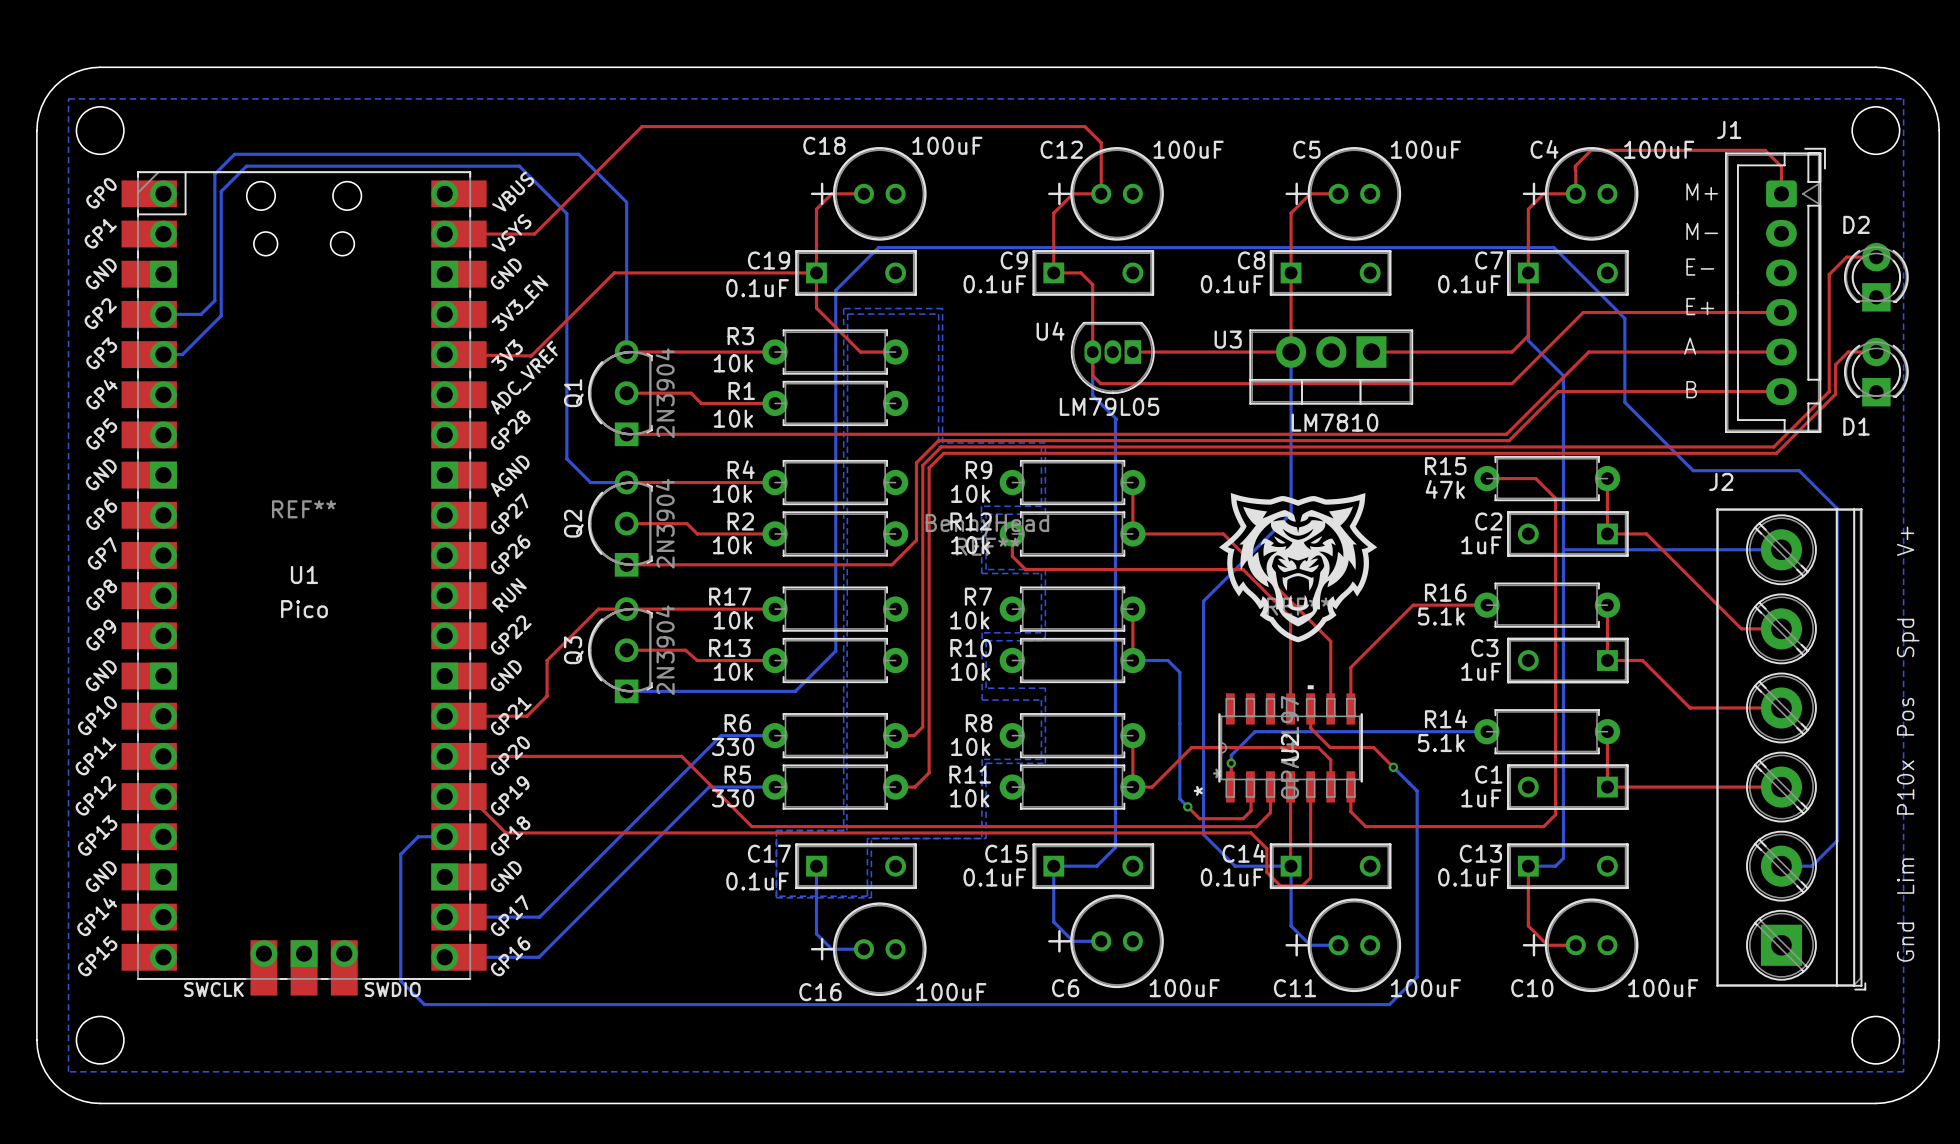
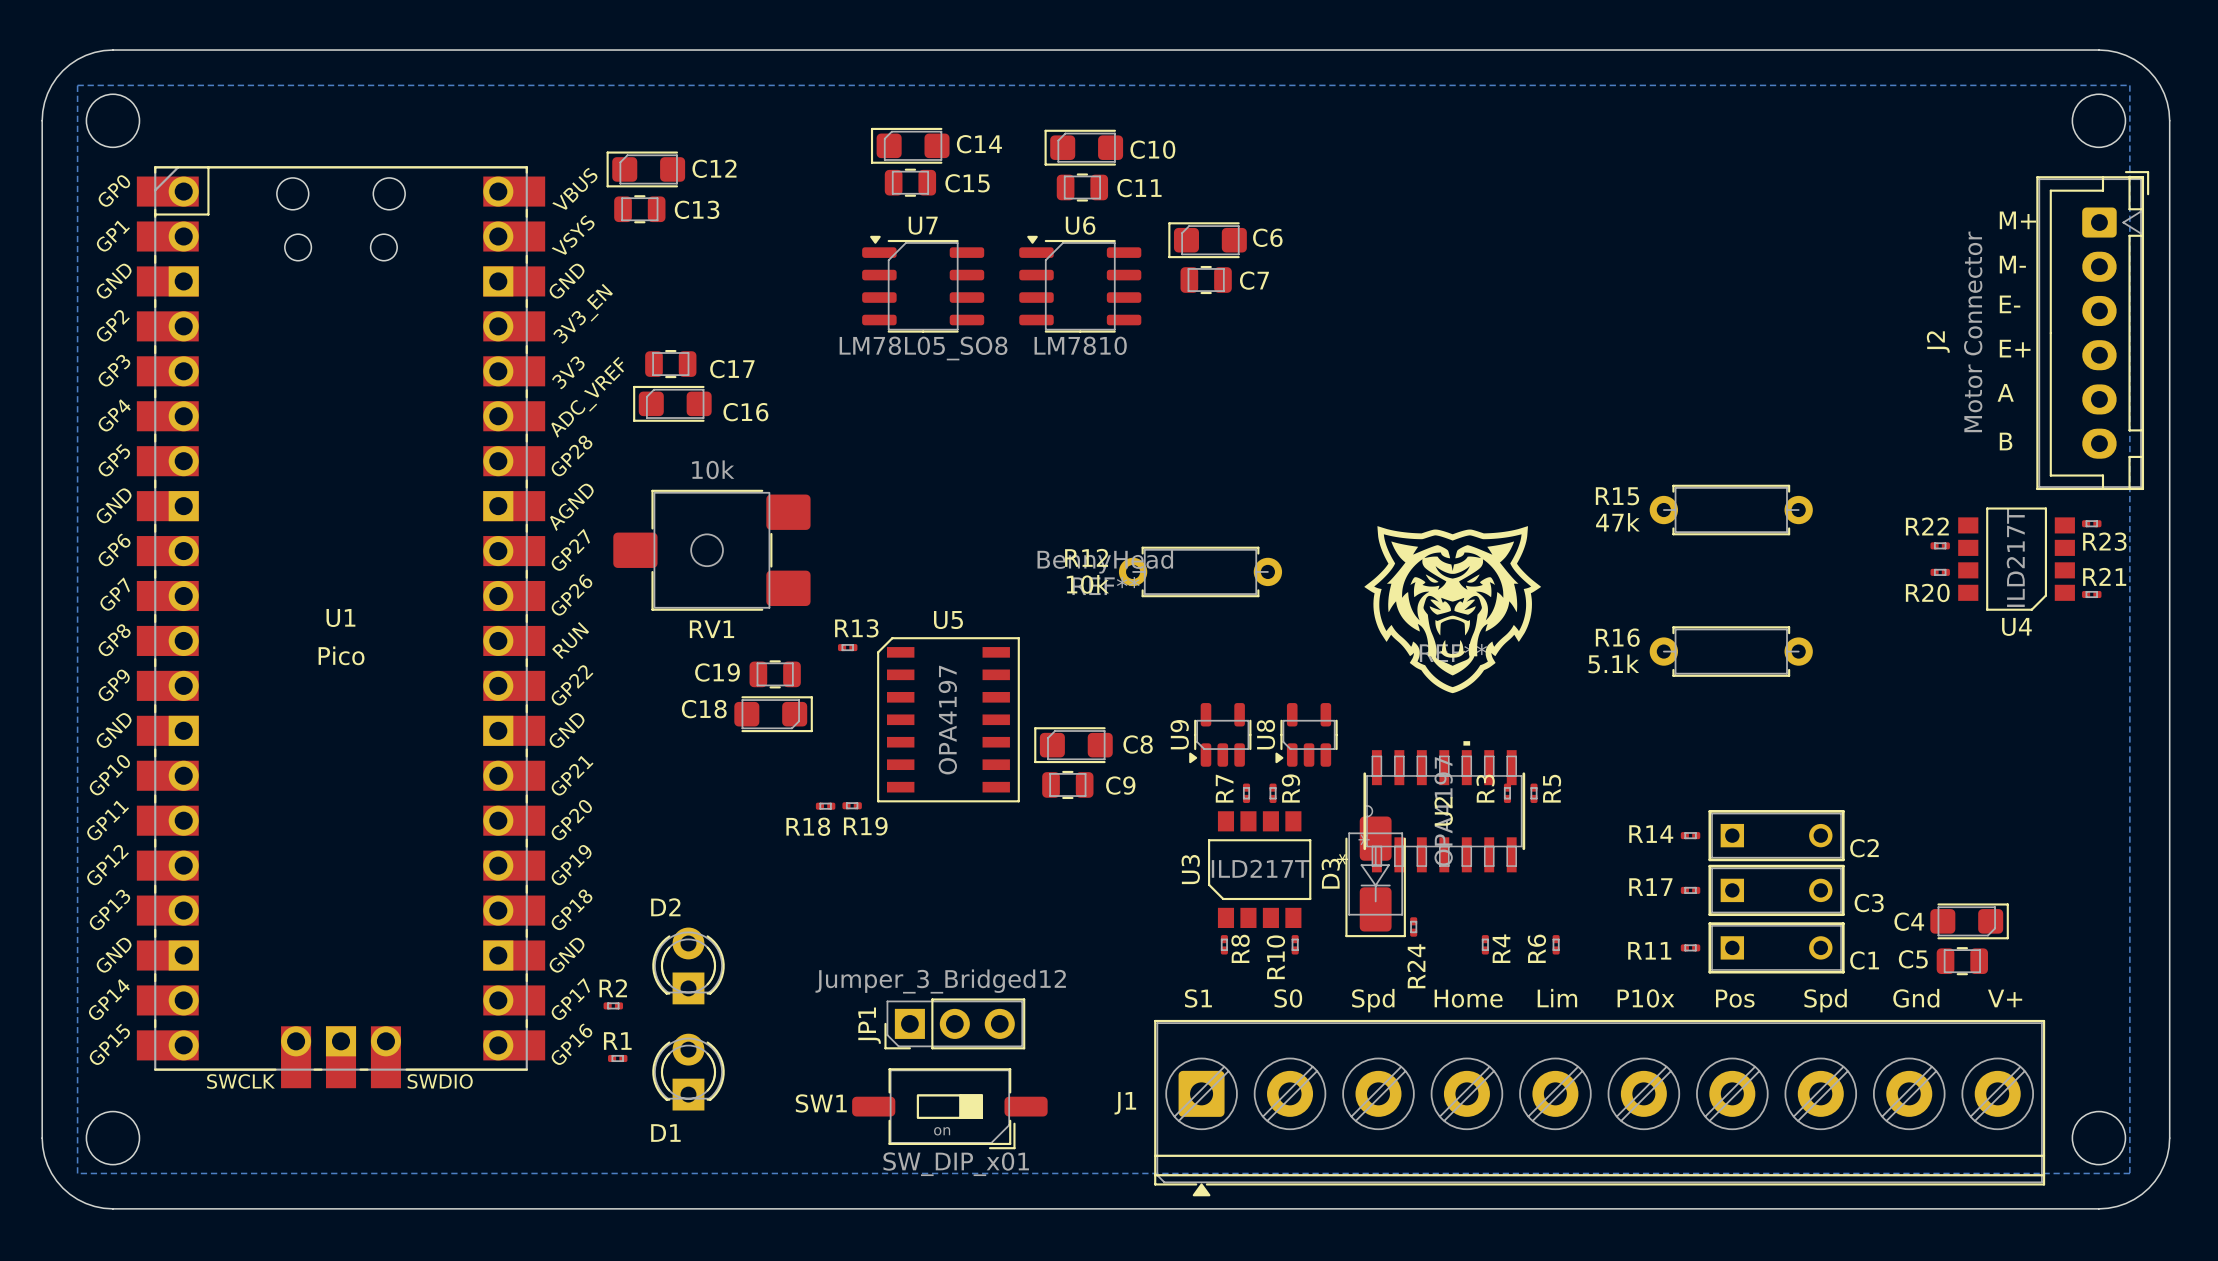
J1 name position: J1 (1729, 129) -> J1 (1125, 1103)
C18 name position: C18 (824, 145) -> C18 (704, 709)
C18 value: 100uF (947, 145) -> none
C18 footprint: [810, 147, 927, 241] -> [734, 696, 813, 733]
C12 footprint: [1048, 147, 1164, 241] -> [606, 151, 686, 188]
C5 footprint: [1285, 147, 1402, 241] -> [1936, 947, 1988, 976]
C4 footprint: [1522, 147, 1639, 241] -> [1930, 903, 2009, 940]
J1 footprint: [1724, 147, 1826, 434] -> [1154, 1019, 2046, 1197]
C12 name position: C12 (1061, 149) -> C12 (714, 168)
C12 value: 100uF (1188, 149) -> none
C5 name position: C5 (1306, 149) -> C5 (1913, 959)
C5 value: 100uF (1425, 149) -> none
C4 name position: C4 (1544, 149) -> C4 (1909, 921)
C4 value: 100uF (1659, 149) -> none
text position: M+ (1702, 191) -> M+ (2017, 220)
top track: (863, 193) (831, 193) (816, 209) (816, 308) (860, 352) (895, 352) -> none
top track: (1338, 193) (1310, 193) (1291, 213) (1291, 352) (1132, 352) -> none
top track: (1781, 193) (1781, 166) (1765, 150) (1591, 150) (1575, 166) (1575, 193) (1543, 193) (1528, 209) (1528, 335) (1512, 352) (1371, 352) -> none
text position: M- (1702, 231) -> M- (2012, 264)
top track: (444, 234) (534, 234) (642, 126) (1084, 126) (1101, 142) (1101, 193) (1073, 193) (1053, 213) (1053, 272) (1080, 272) (1092, 284) (1092, 359) -> none
C19 footprint: [795, 250, 917, 296] -> [749, 660, 801, 689]
C9 footprint: [1032, 250, 1155, 296] -> [1042, 770, 1094, 800]
C8 footprint: [1269, 250, 1392, 296] -> [1034, 727, 1113, 764]
C7 footprint: [1507, 250, 1629, 296] -> [1180, 265, 1232, 295]
top track: (1876, 257) (1846, 257) (1829, 274) (1829, 391) (1773, 446) (941, 446) (922, 465) (922, 726) (914, 735) (895, 735) -> none
C19 name position: C19 (769, 260) -> C19 (717, 672)
C9 name position: C9 (1014, 260) -> C9 (1120, 785)
C8 name position: C8 (1251, 260) -> C8 (1138, 744)
C7 name position: C7 (1489, 260) -> C7 (1254, 280)
text position: E- (1700, 267) -> E- (2010, 304)
top track: (816, 272) (614, 272) (531, 355) (444, 354) -> none
bottom track: (1528, 272) (1528, 340) (1563, 375) (1563, 858) (1555, 866) (1528, 866) -> none
U7: none -> LM78L05_SO8 (923, 284)
U6: none -> LM7810 (1080, 284)
D2 position: (1876, 277) -> (688, 965)
C9 value: 0.1uF (994, 284) -> none
C8 value: 0.1uF (1232, 284) -> none
C7 value: 0.1uF (1469, 284) -> none
C19 value: 0.1uF (757, 288) -> none
text position: E+ (1700, 306) -> E+ (2015, 348)
top track: (1781, 312) (1583, 312) (1512, 383) (1100, 383) (1092, 375) (1092, 360) -> none
bottom track: (163, 314) (201, 314) (214, 300) (214, 174) (234, 154) (578, 154) (626, 202) (626, 352) -> none
J2 value: none -> Motor Connector (1973, 331)
U4 footprint: [1070, 321, 1155, 395] -> [1958, 507, 2075, 611]
R3 footprint: [762, 329, 909, 375] -> [1503, 783, 1512, 804]
U3 footprint: [1249, 329, 1414, 405] -> [1208, 811, 1312, 929]
U4 name position: U4 (1050, 331) -> U4 (2016, 626)
R3 name position: R3 (740, 336) -> R3 (1485, 788)
U3 name position: U3 (1228, 339) -> U3 (1190, 869)
text position: A (1690, 346) -> A (2005, 392)
top track: (626, 352) (775, 352) -> none
bottom track: (1092, 352) (1092, 395) (1116, 419) (1115, 847) (1096, 866) (1053, 866) (1053, 922) (1073, 941) (1101, 941) -> none
bottom track: (1291, 352) (1291, 513) (1203, 601) (1203, 834) (1235, 866) (1291, 866) (1291, 925) (1310, 945) (1338, 945) -> none
top track: (1781, 352) (1588, 352) (1506, 434) (626, 434) -> none
top track: (1876, 352) (1848, 352) (1835, 364) (1835, 394) (1776, 453) (943, 453) (929, 468) (929, 772) (914, 787) (895, 787) -> none
bottom track: (163, 354) (182, 354) (221, 315) (221, 191) (246, 166) (519, 166) (566, 213) (566, 458) (590, 482) (626, 482) -> none
R3 value: 10k (733, 363) -> none
D1 position: (1876, 372) -> (688, 1072)
R1 footprint: [762, 380, 909, 427] -> [607, 1054, 628, 1063]
text position: B (1691, 389) -> B (2006, 441)
R1 name position: R1 (741, 390) -> R1 (617, 1041)
top track: (1781, 391) (1558, 391) (1509, 440) (938, 440) (916, 462) (916, 540) (891, 564) (626, 564) -> none
Q1: 2N3904 (620, 393) -> none
top track: (626, 393) (691, 393) (701, 403) (775, 403) -> none
U4 value: LM79L05 (1109, 406) -> ILD217T (2015, 557)
R1 value: 10k (733, 418) -> none
U3 value: LM7810 (1334, 422) -> ILD217T (1260, 868)
R4 footprint: [762, 459, 909, 506] -> [1481, 935, 1489, 955]
R9 footprint: [999, 459, 1146, 506] -> [1269, 783, 1277, 804]
R4 name position: R4 (741, 469) -> R4 (1501, 948)
R9 name position: R9 (979, 470) -> R9 (1290, 788)
top track: (1486, 478) (1535, 478) (1555, 498) (1555, 814) (1543, 826) (1365, 826) (1350, 811) (1350, 787) -> none
top track: (1607, 478) (1607, 533) (1646, 533) (1741, 628) (1781, 628) -> none
J2 name position: J2 (1721, 481) -> J2 (1938, 342)
top track: (626, 482) (775, 482) -> none
top track: (1132, 482) (1132, 533) (1223, 533) (1330, 641) (1330, 708) -> none
R23: none -> (2091, 523)
R4 value: 10k (732, 493) -> none
R9 value: 10k (970, 493) -> none
J2 footprint: [1716, 508, 1867, 991] -> [2036, 171, 2150, 491]
REF**: (304, 509) -> none
R22: none -> (1940, 545)
R2 footprint: [762, 511, 909, 557] -> [603, 1002, 624, 1010]
RV1: none -> 10k (711, 550)
R2 name position: R2 (740, 521) -> R2 (613, 988)
Q2: 2N3904 (620, 523) -> none
top track: (626, 523) (687, 523) (697, 533) (775, 533) -> none
top track: (1012, 533) (1012, 556) (1025, 569) (1243, 569) (1290, 617) (1290, 708) -> none
C2 rotation: 0° (1567, 533) -> 180° (1776, 835)
C2 position: (1567, 533) -> (1776, 835)
R20: none -> (1940, 572)
text rotation: 0° (1905, 541) -> 90° clockwise (2005, 998)
text position: V+ (1905, 541) -> V+ (2005, 998)
R2 value: 10k (732, 545) -> none
C2 value: 1uF (1481, 545) -> none
bottom track: (1563, 549) (1781, 549) -> none
R21: none -> (2091, 594)
R17 footprint: [762, 586, 909, 632] -> [1680, 886, 1701, 894]
R7 footprint: [999, 586, 1146, 632] -> [1242, 783, 1251, 804]
R17 name position: R17 (730, 596) -> R17 (1650, 887)
R7 name position: R7 (978, 596) -> R7 (1224, 788)
top track: (1486, 605) (1413, 605) (1350, 667) (1350, 708) -> none
top track: (1607, 605) (1607, 660) (1642, 660) (1690, 707) (1781, 707) -> none
top track: (775, 609) (598, 609) (547, 660) (547, 696) (526, 716) (444, 716) -> none
top track: (1132, 609) (1132, 660) -> none
R17 value: 10k (733, 620) -> none
R7 value: 10k (969, 620) -> none
R13 footprint: [762, 637, 909, 684] -> [837, 644, 858, 652]
R10 footprint: [999, 637, 1146, 684] -> [1291, 935, 1299, 955]
text: Spd (1908, 638) -> none
R13 name position: R13 (729, 648) -> R13 (856, 628)
R10 name position: R10 (971, 648) -> R10 (1275, 957)
Q3: 2N3904 (620, 650) -> none
top track: (626, 650) (685, 650) (697, 660) (775, 660) -> none
bottom track: (1132, 660) (1167, 660) (1179, 672) (1179, 798) (1187, 806) -> none
C3 rotation: 0° (1567, 660) -> 180° (1776, 890)
C3 position: (1567, 660) -> (1776, 890)
U5: none -> OPA4197 (948, 719)
R13 value: 10k (733, 671) -> none
R10 value: 10k (970, 671) -> none
C3 value: 1uF (1481, 671) -> none
U9: none -> (1220, 734)
U8: none -> (1306, 734)
bottom track: (626, 691) (795, 691) (835, 651) (835, 290) (878, 247) (1553, 247) (1624, 318) (1624, 402) (1693, 470) (1799, 470) (1837, 508) (1837, 840) (1811, 866) (1781, 866) -> none
top track: (1310, 708) (1310, 728) (1330, 747) (1373, 747) (1393, 767) -> none
R14 footprint: [1474, 709, 1621, 755] -> [1680, 832, 1701, 840]
R6 footprint: [762, 713, 909, 759] -> [1552, 935, 1560, 955]
R8 footprint: [999, 713, 1146, 759] -> [1220, 935, 1228, 955]
text: Pos (1905, 716) -> none
R14 name position: R14 (1446, 718) -> R14 (1651, 834)
R6 name position: R6 (737, 723) -> R6 (1536, 948)
R8 name position: R8 (979, 723) -> R8 (1240, 948)
bottom track: (1486, 731) (1255, 731) (1231, 755) (1231, 759) -> none
top track: (1607, 731) (1607, 787) (1781, 787) -> none
bottom track: (775, 735) (721, 735) (539, 917) (444, 917) -> none
top track: (1132, 735) (1132, 787) (1152, 787) (1191, 747) (1318, 747) (1330, 760) (1330, 787) -> none
R14 value: 5.1k (1441, 742) -> none
R18: none -> (825, 806)
R19: none -> (852, 805)
R6 value: 330 (733, 746) -> none
R8 value: 10k (970, 746) -> none
top track: (444, 756) (681, 756) (751, 826) (1256, 826) (1270, 812) (1270, 787) -> none
via: (1231, 763) -> none
R5 footprint: [762, 764, 909, 810] -> [1530, 783, 1538, 804]
R11 footprint: [999, 764, 1146, 810] -> [1680, 944, 1701, 952]
bottom track: (1393, 767) (1417, 791) (1417, 976) (1389, 1004) (424, 1004) (400, 980) (400, 854) (418, 836) (444, 836) -> none
via: (1393, 767) -> none
R5 name position: R5 (737, 774) -> R5 (1552, 788)
R11 name position: R11 (970, 774) -> R11 (1649, 950)
bottom track: (775, 787) (709, 787) (539, 957) (444, 957) -> none
top track: (1251, 787) (1251, 810) (1243, 818) (1199, 818) (1187, 806) -> none
top track: (1290, 787) (1291, 866) -> none
top track: (1310, 787) (1310, 877) (1302, 885) (1280, 885) (1266, 872) (1266, 848) (1251, 832) (505, 832) (469, 796) (444, 796) -> none
C1 rotation: 0° (1567, 787) -> 180° (1776, 947)
C1 position: (1567, 787) -> (1776, 947)
text: P10x (1905, 787) -> none
R5 value: 330 (733, 798) -> none
R11 value: 10k (969, 798) -> none
C1 value: 1uF (1481, 798) -> none
via: (1187, 806) -> none
D3: none -> (1375, 876)
bottom zone outline: (843, 830) (843, 308) (942, 308) (942, 443) (1045, 443) (1045, 514) (986, 514) (986, 569) (1045, 569) (1045, 636) (1041, 640) (986, 640) (986, 688) (1045, 688) (1045, 763) (986, 763) (986, 838) (867, 838) (867, 896) (776, 896) -> none
bottom zone outline: (871, 838) (871, 897) (776, 897) (776, 830) (846, 830) (847, 314) (938, 314) (938, 446) (1041, 446) (1041, 506) (981, 506) (981, 573) (1041, 573) (1041, 632) (982, 632) (982, 700) (1041, 700) (1041, 759) (982, 759) (981, 838) -> none
C17 footprint: [795, 843, 917, 890] -> [645, 349, 697, 379]
C15 footprint: [1032, 843, 1155, 890] -> [884, 168, 937, 197]
C14 footprint: [1269, 843, 1392, 890] -> [870, 127, 950, 164]
C13 footprint: [1507, 843, 1629, 890] -> [614, 195, 666, 224]
R24: none -> (1413, 926)
C17 name position: C17 (769, 853) -> C17 (732, 369)
C15 name position: C15 (1006, 853) -> C15 (967, 183)
C14 name position: C14 (1243, 853) -> C14 (979, 144)
C13 name position: C13 (1480, 853) -> C13 (697, 209)
bottom track: (816, 866) (816, 933) (831, 949) (863, 949) -> none
top track: (1528, 866) (1528, 925) (1547, 945) (1575, 945) -> none
text: Lim (1905, 876) -> none
C15 value: 0.1uF (994, 877) -> none
C14 value: 0.1uF (1232, 877) -> none
C13 value: 0.1uF (1469, 877) -> none
C17 value: 0.1uF (757, 881) -> none
C6 footprint: [1048, 894, 1164, 989] -> [1168, 222, 1247, 259]
C11 footprint: [1285, 898, 1402, 993] -> [1056, 173, 1109, 202]
C10 footprint: [1522, 898, 1639, 993] -> [1044, 129, 1124, 166]
C16 footprint: [810, 902, 927, 997] -> [633, 385, 712, 422]
text: none -> S1 (1198, 998)
text: none -> S0 (1288, 998)
text: none -> Home (1468, 998)
text: none -> Lim (1557, 998)
text: none -> P10x (1645, 998)
text: none -> Pos (1735, 998)
text: none -> Spd (1373, 1000)
text: none -> Spd (1825, 1000)
JP1: none -> Jumper_3_Bridged12 (954, 1023)
text rotation: 0° (1905, 942) -> 90° clockwise (1916, 998)
text position: Gnd (1905, 942) -> Gnd (1916, 998)
C6 name position: C6 (1065, 988) -> C6 (1267, 237)
C6 value: 100uF (1184, 988) -> none
C11 name position: C11 (1295, 988) -> C11 (1139, 188)
C11 value: 100uF (1425, 988) -> none
C10 name position: C10 (1532, 988) -> C10 (1152, 149)
C10 value: 100uF (1663, 988) -> none
C16 name position: C16 (820, 992) -> C16 (745, 412)
C16 value: 100uF (951, 992) -> none
SW1: none -> SW_DIP_x01 (949, 1108)

